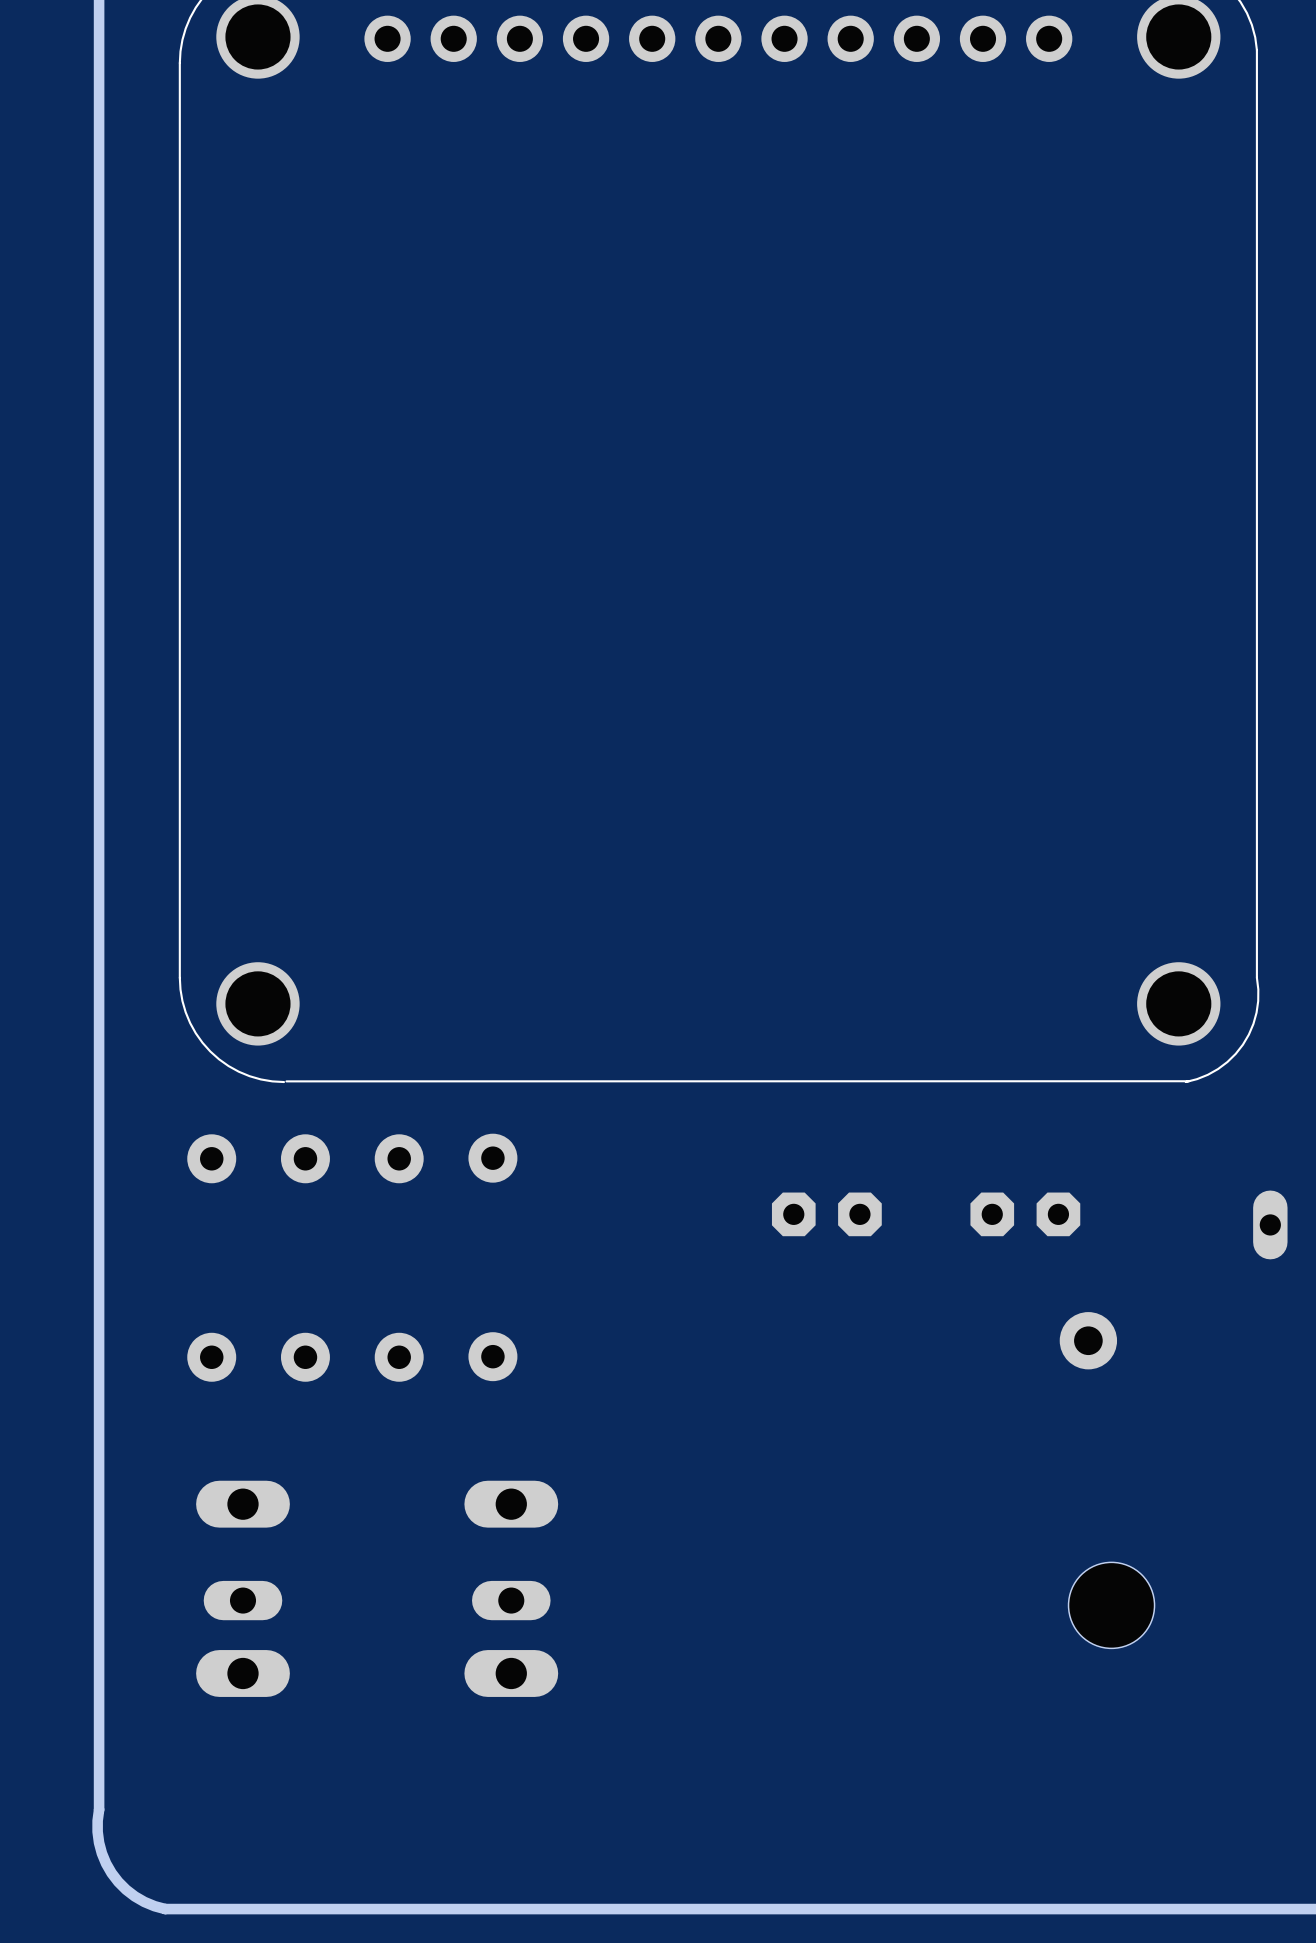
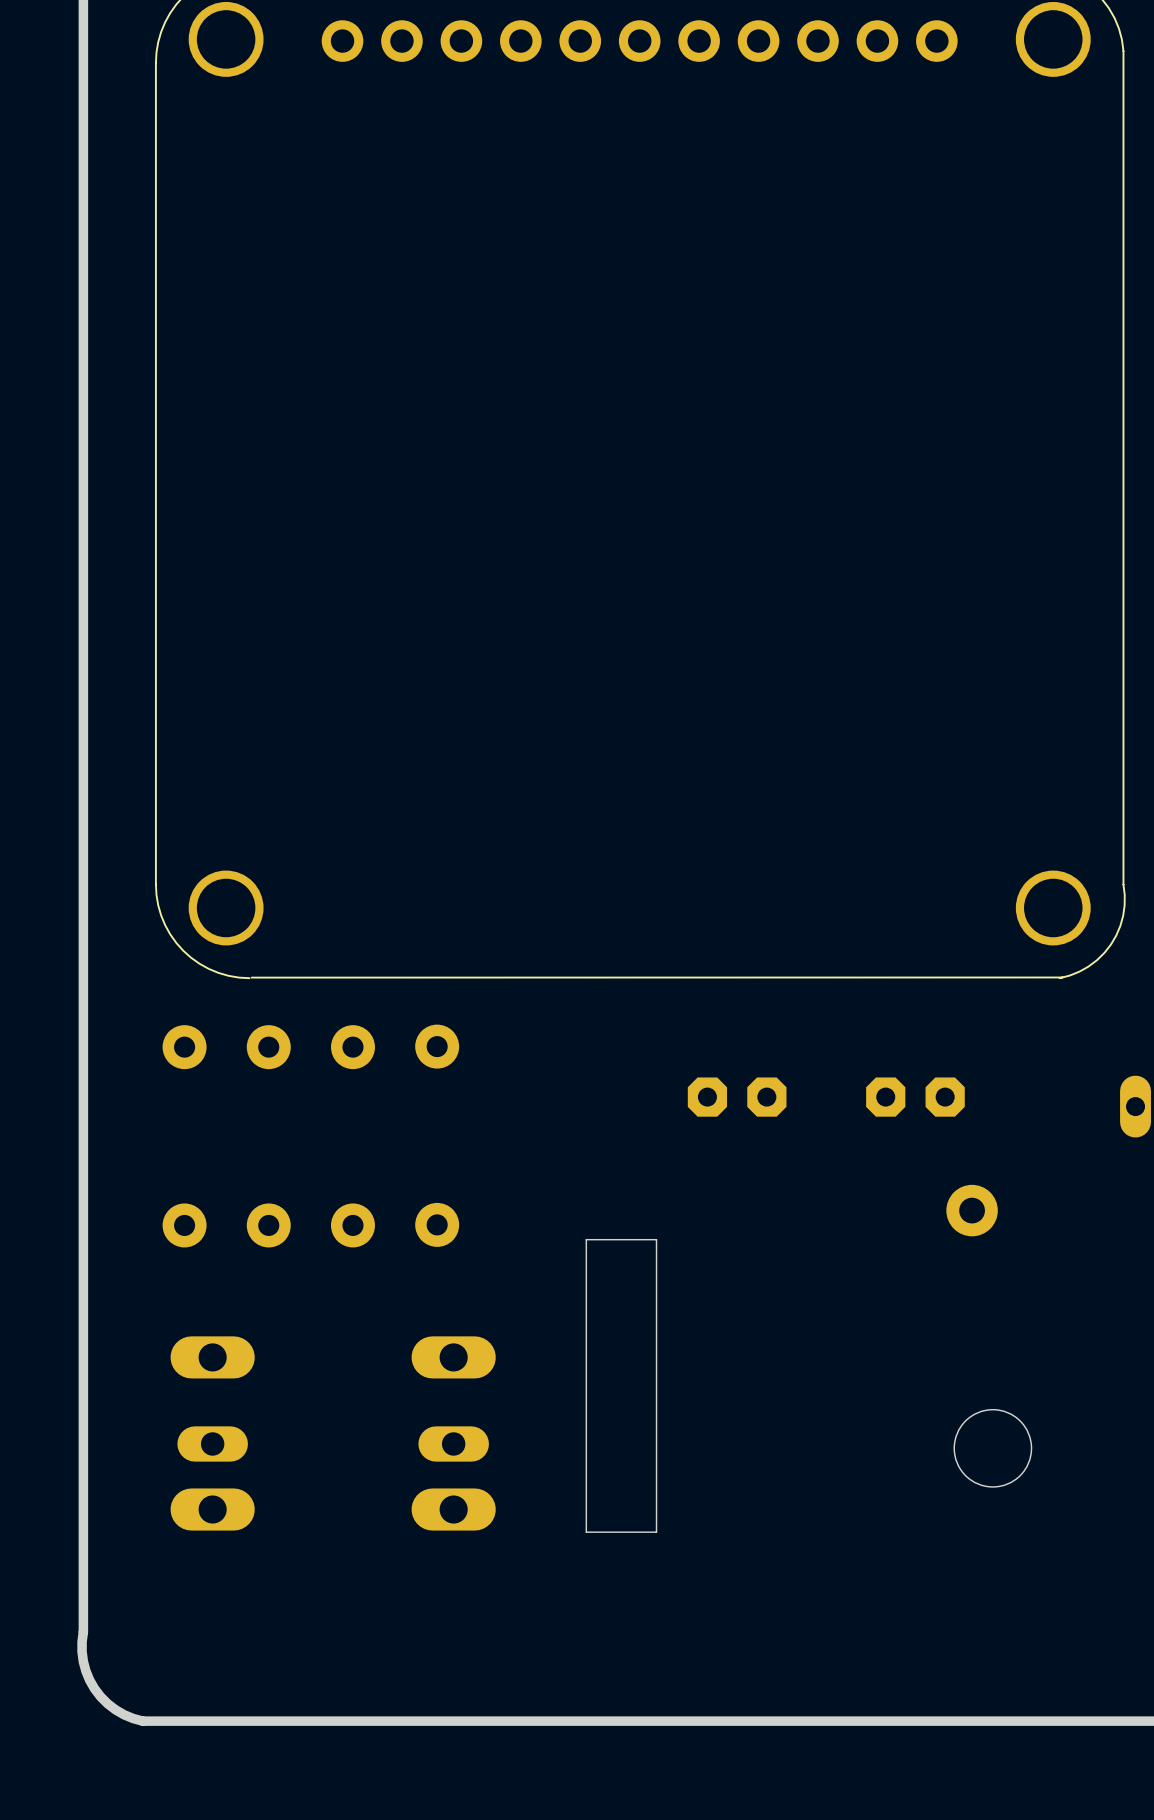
part: none -> (621, 1385)

